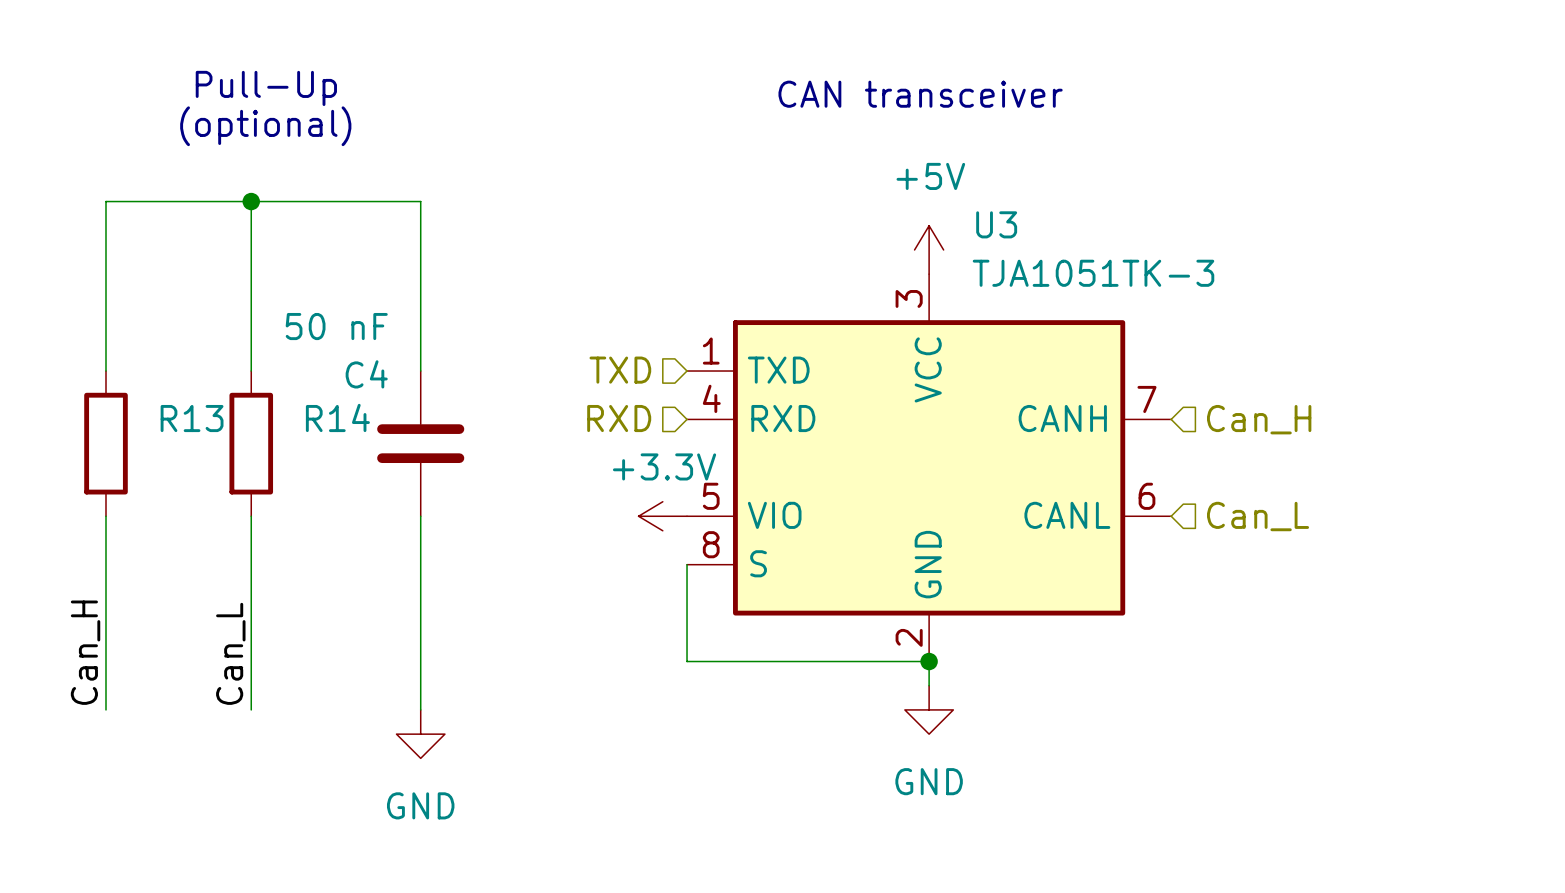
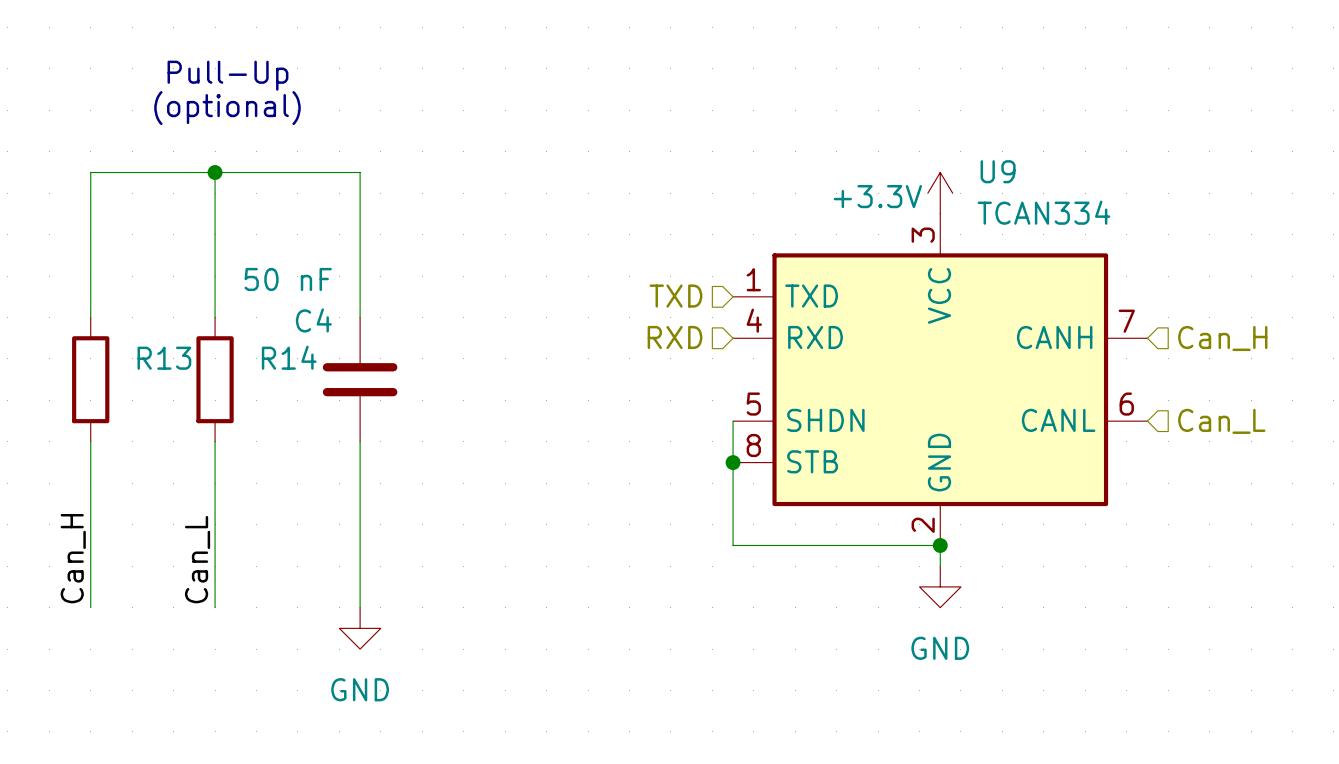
text: CAN transceiver (920, 94) -> none
power symbol: none -> +3.3V (940, 193)
power symbol: +5V (929, 249) -> none
hierarchical label position: TXD (620, 370) -> TXD (676, 296)
hierarchical label position: RXD (619, 418) -> RXD (675, 337)
hierarchical label position: Can_H (1259, 419) -> Can_H (1222, 338)
U9: none -> TCAN334 (940, 379)
U3: TJA1051TK-3 (929, 467) -> none
wire: none -> (733, 421) (733, 545) (940, 545) (940, 566)
power symbol: +3.3V (662, 516) -> none
hierarchical label position: Can_L (1258, 516) -> Can_L (1221, 421)
junction: none -> (733, 462)
wire: (687, 564) (687, 661) (929, 661) (929, 685) -> none
junction: none -> (940, 545)
junction: (929, 661) -> none
power symbol position: GND (929, 709) -> GND (940, 586)

